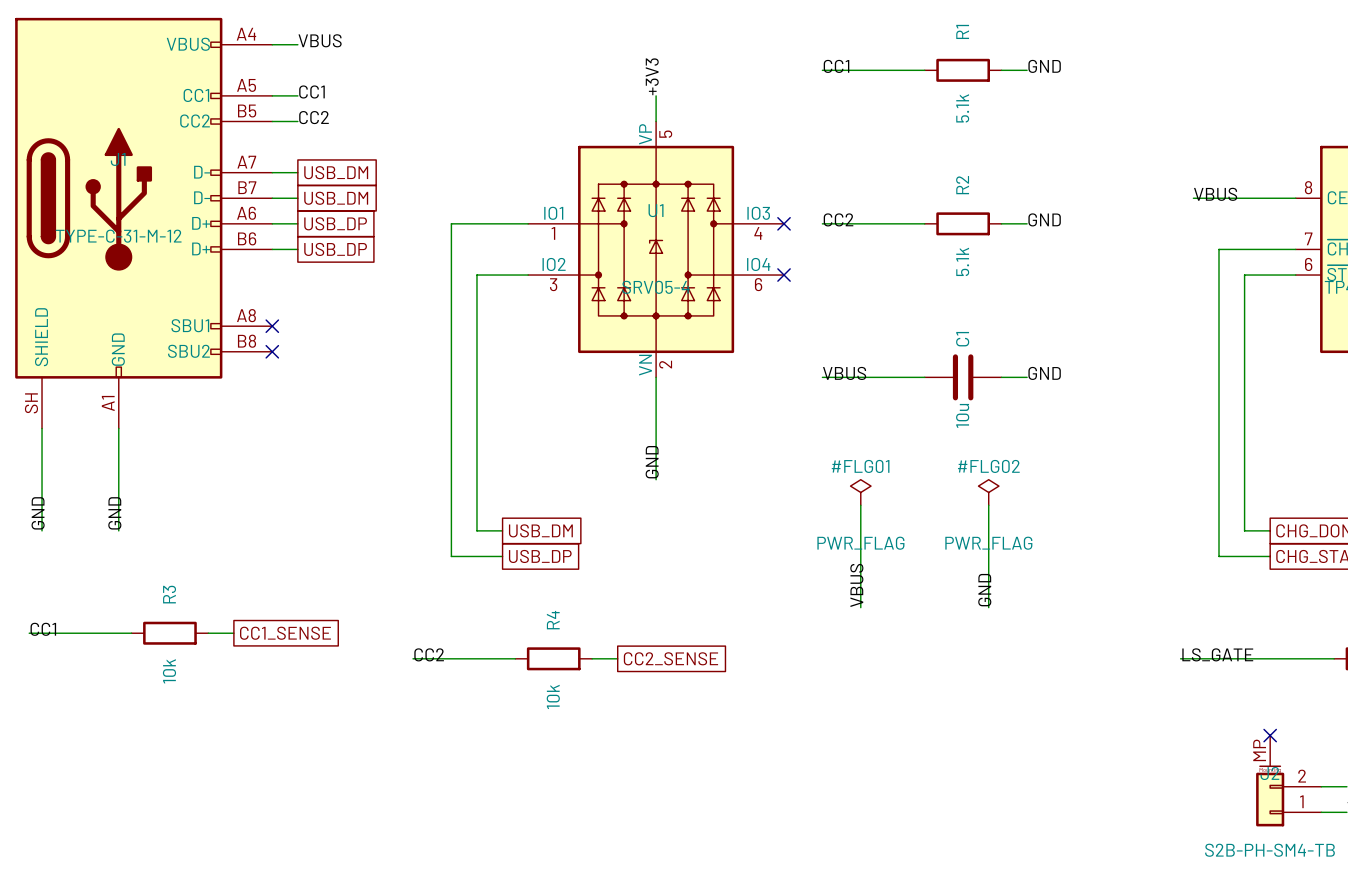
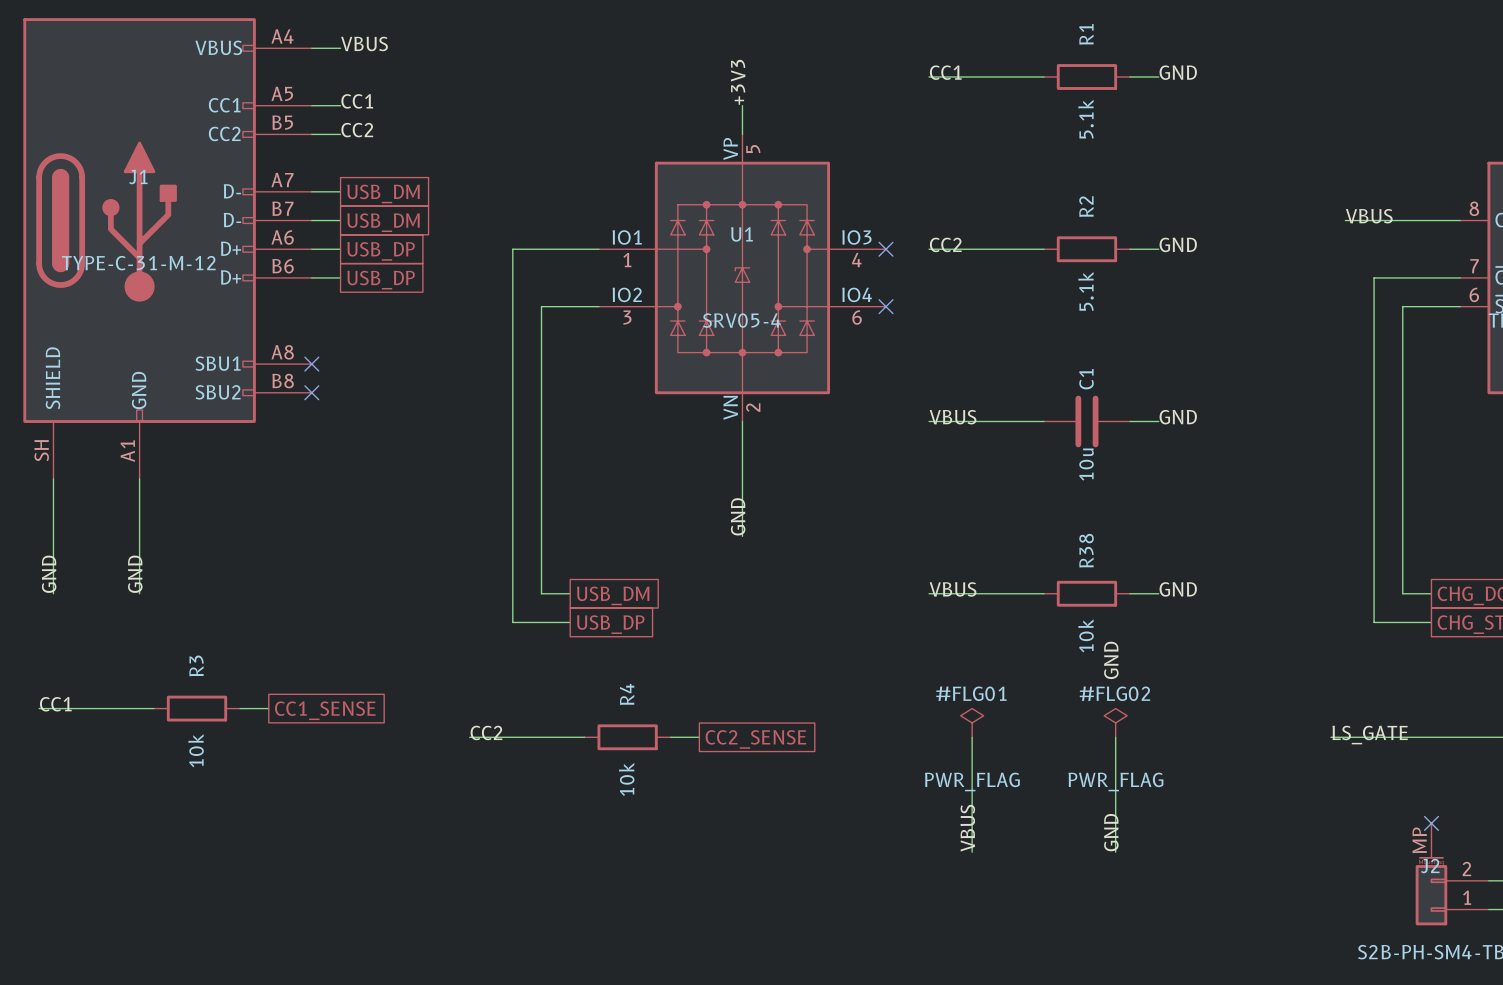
#FLG01 position: PWR_FLAG (860, 492) -> PWR_FLAG (972, 722)
#FLG02 position: PWR_FLAG (988, 492) -> PWR_FLAG (1115, 722)
wire: (860, 505) (860, 607) -> (972, 737) (972, 852)
wire: (988, 505) (988, 607) -> (1115, 737) (1115, 852)
label: none -> VBUS (953, 589)
label: none -> GND (1178, 589)
wire: none -> (929, 593) (1043, 593)
R38: none -> 10k (1086, 593)
wire: none -> (1130, 593) (1158, 593)
label: VBUS (856, 585) -> none
label: none -> VBUS (967, 828)
label: none -> GND (1111, 832)

